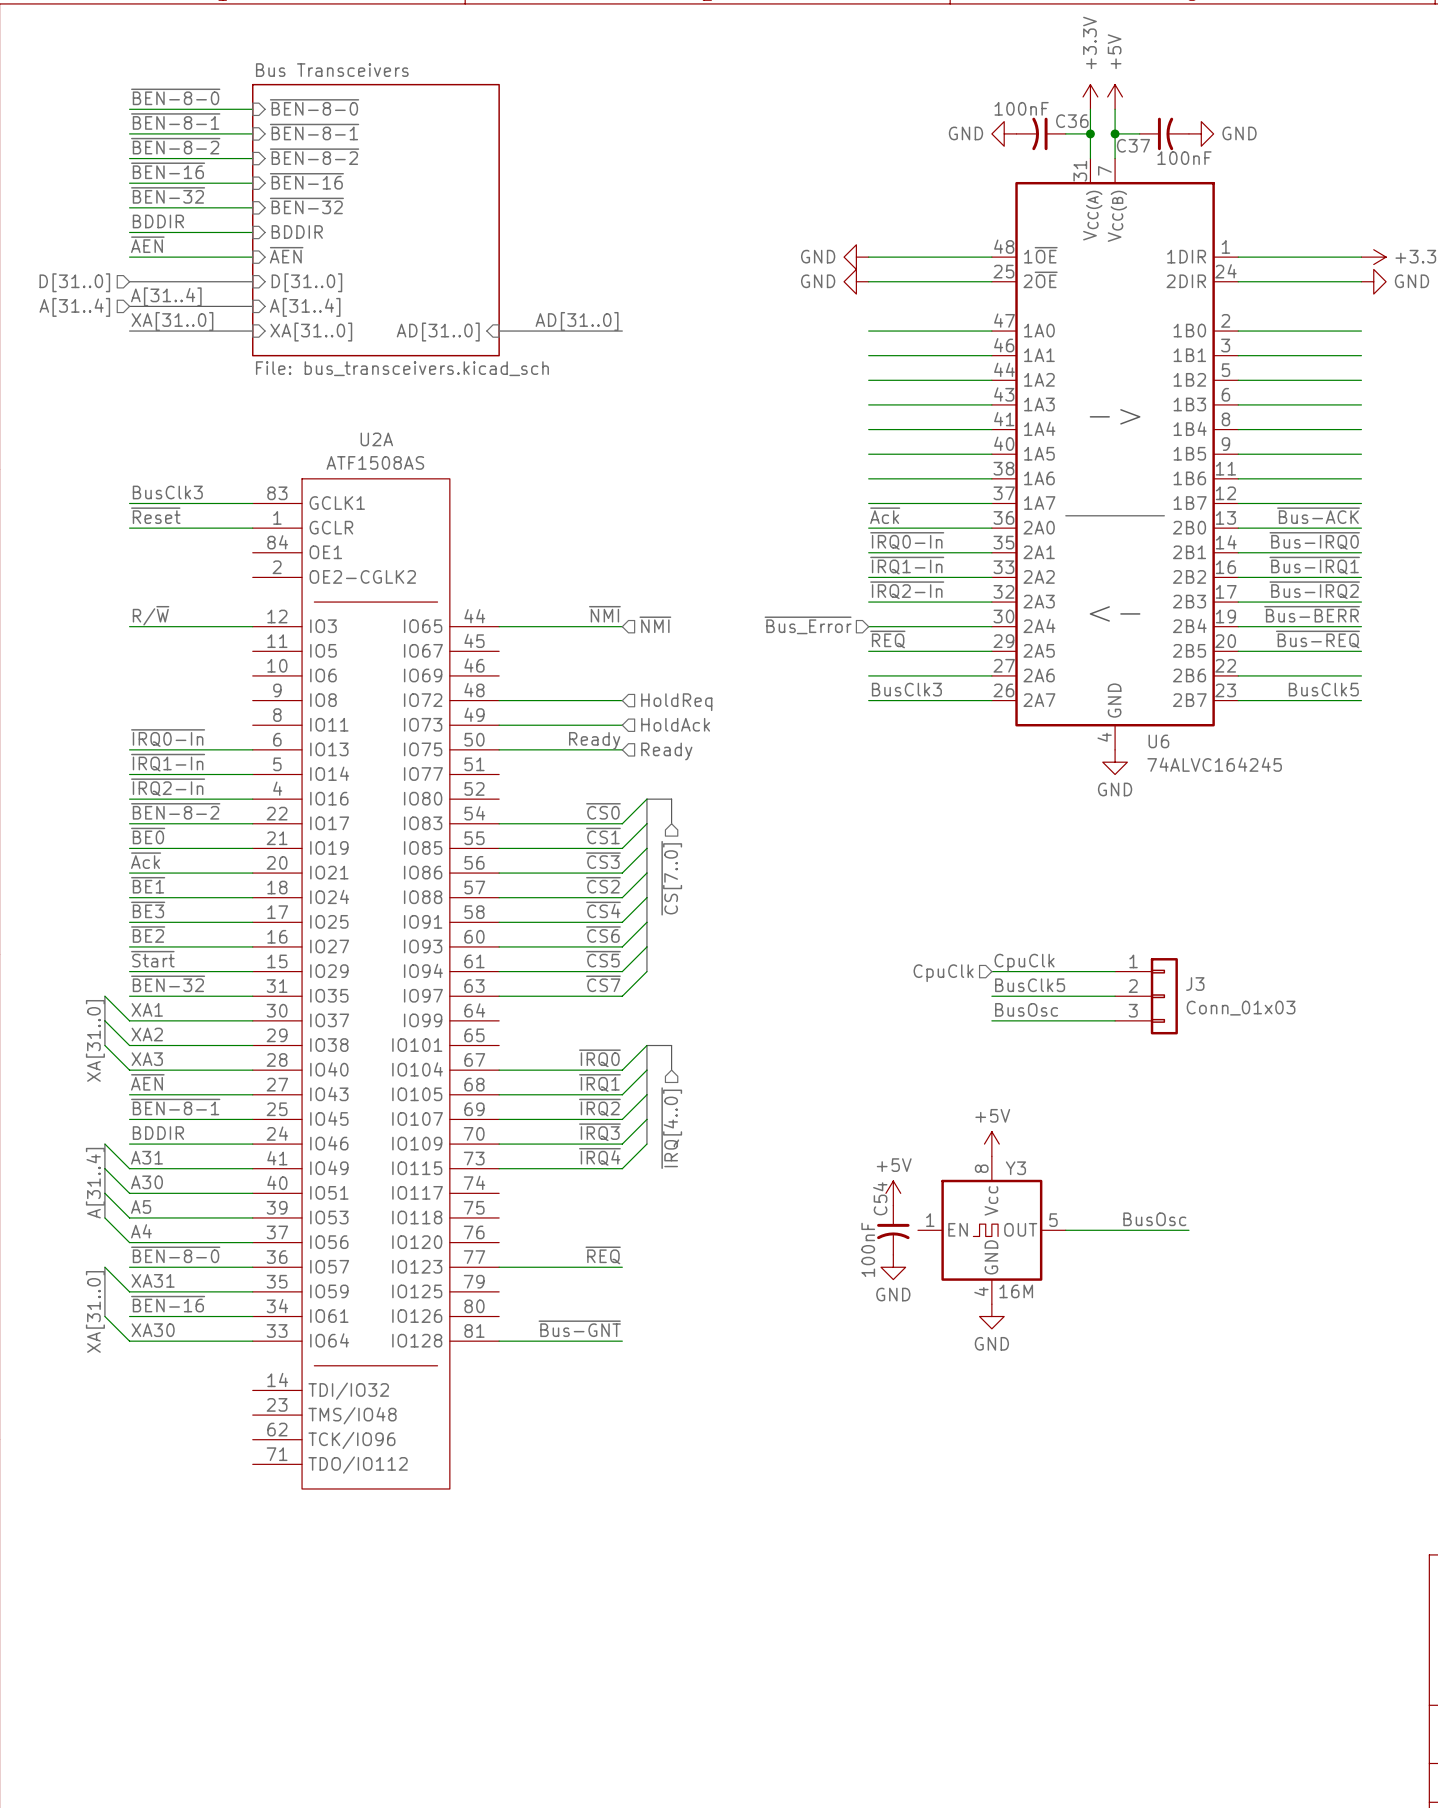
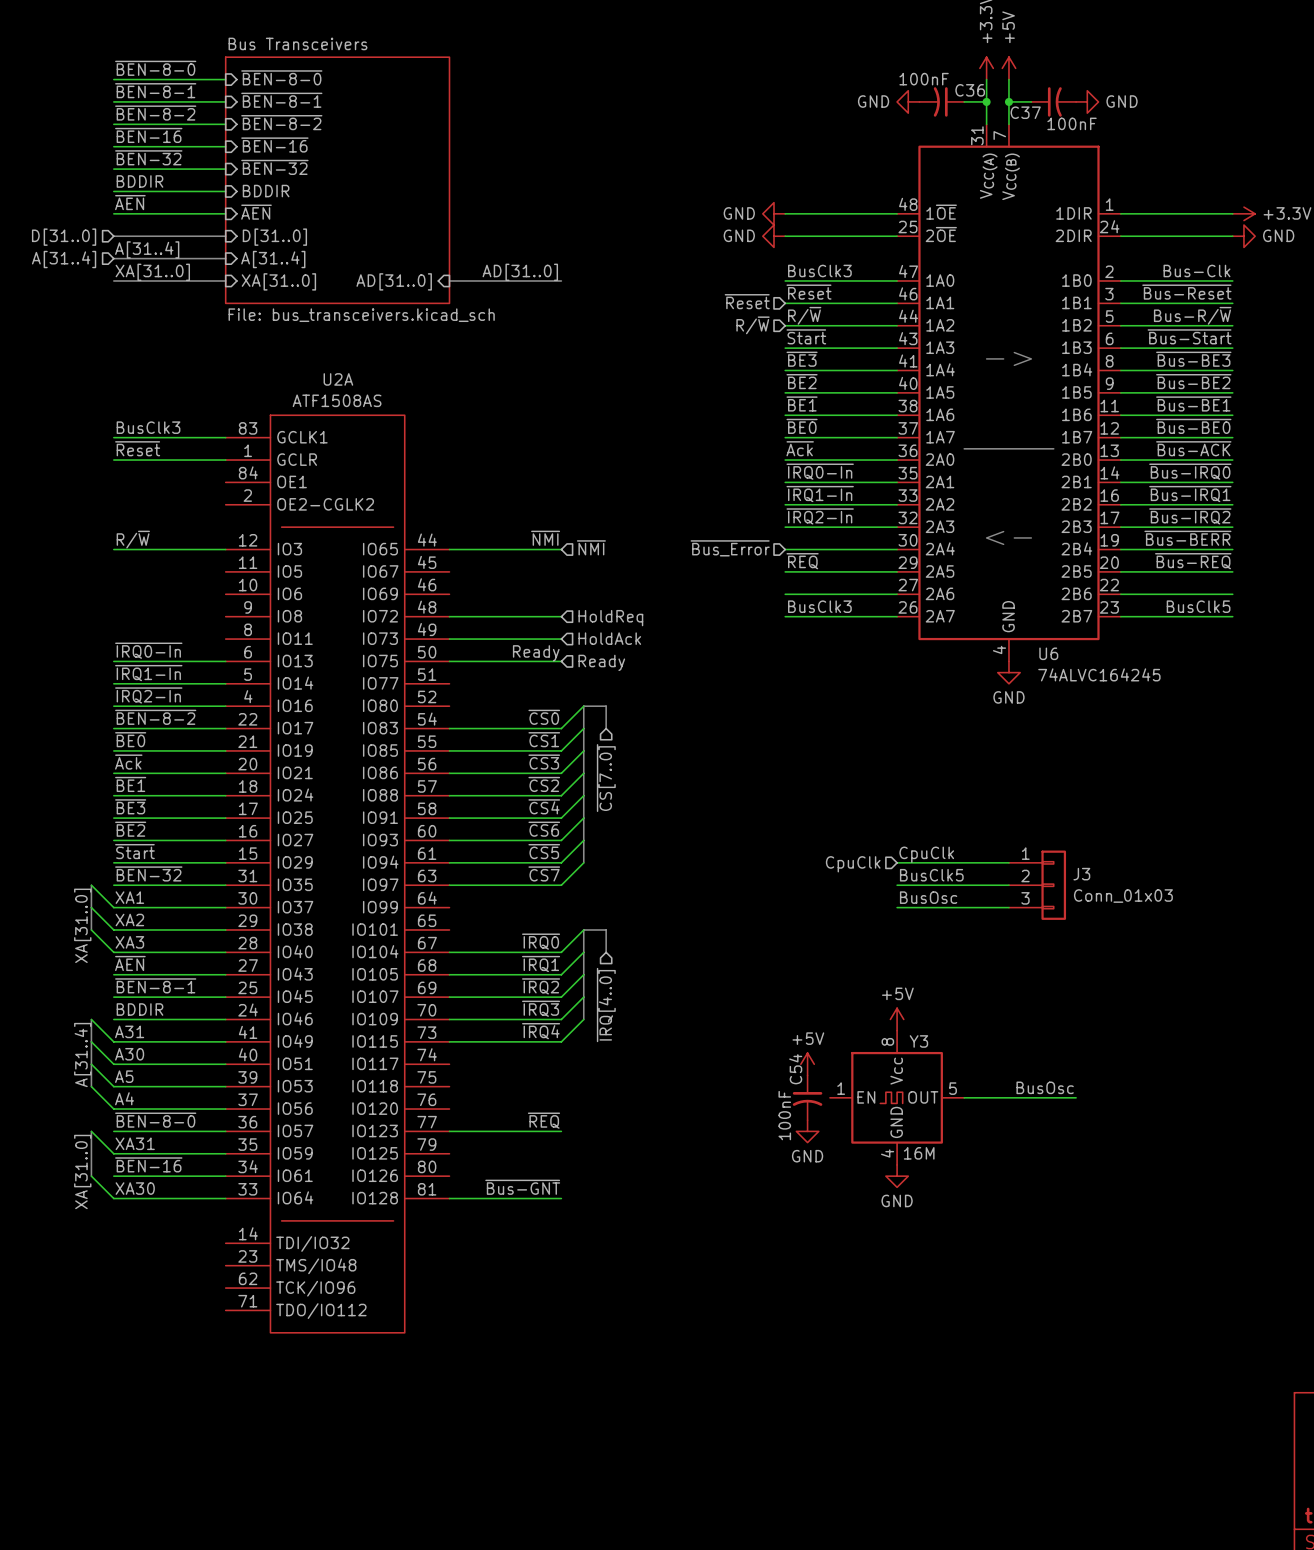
label: none -> BusClk3 (819, 271)
label: none -> Bus-Clk (1196, 271)
label: none -> ~{Reset} (809, 292)
label: none -> ~{Bus-Reset} (1186, 292)
hierarchical label: none -> ~{Reset} (747, 301)
label: none -> R/~{W} (804, 315)
label: none -> Bus-R/~{W} (1192, 315)
hierarchical label: none -> R/~{W} (753, 325)
label: none -> ~{Start} (806, 336)
label: none -> ~{Bus-Start} (1189, 336)
label: none -> ~{BE3} (802, 359)
label: none -> ~{Bus-BE3} (1193, 359)
label: none -> ~{BE2} (802, 381)
label: none -> ~{Bus-BE2} (1193, 381)
label: none -> ~{BE1} (802, 403)
label: none -> ~{Bus-BE1} (1193, 403)
label: none -> ~{BE0} (802, 426)
label: none -> ~{Bus-BE0} (1193, 426)

